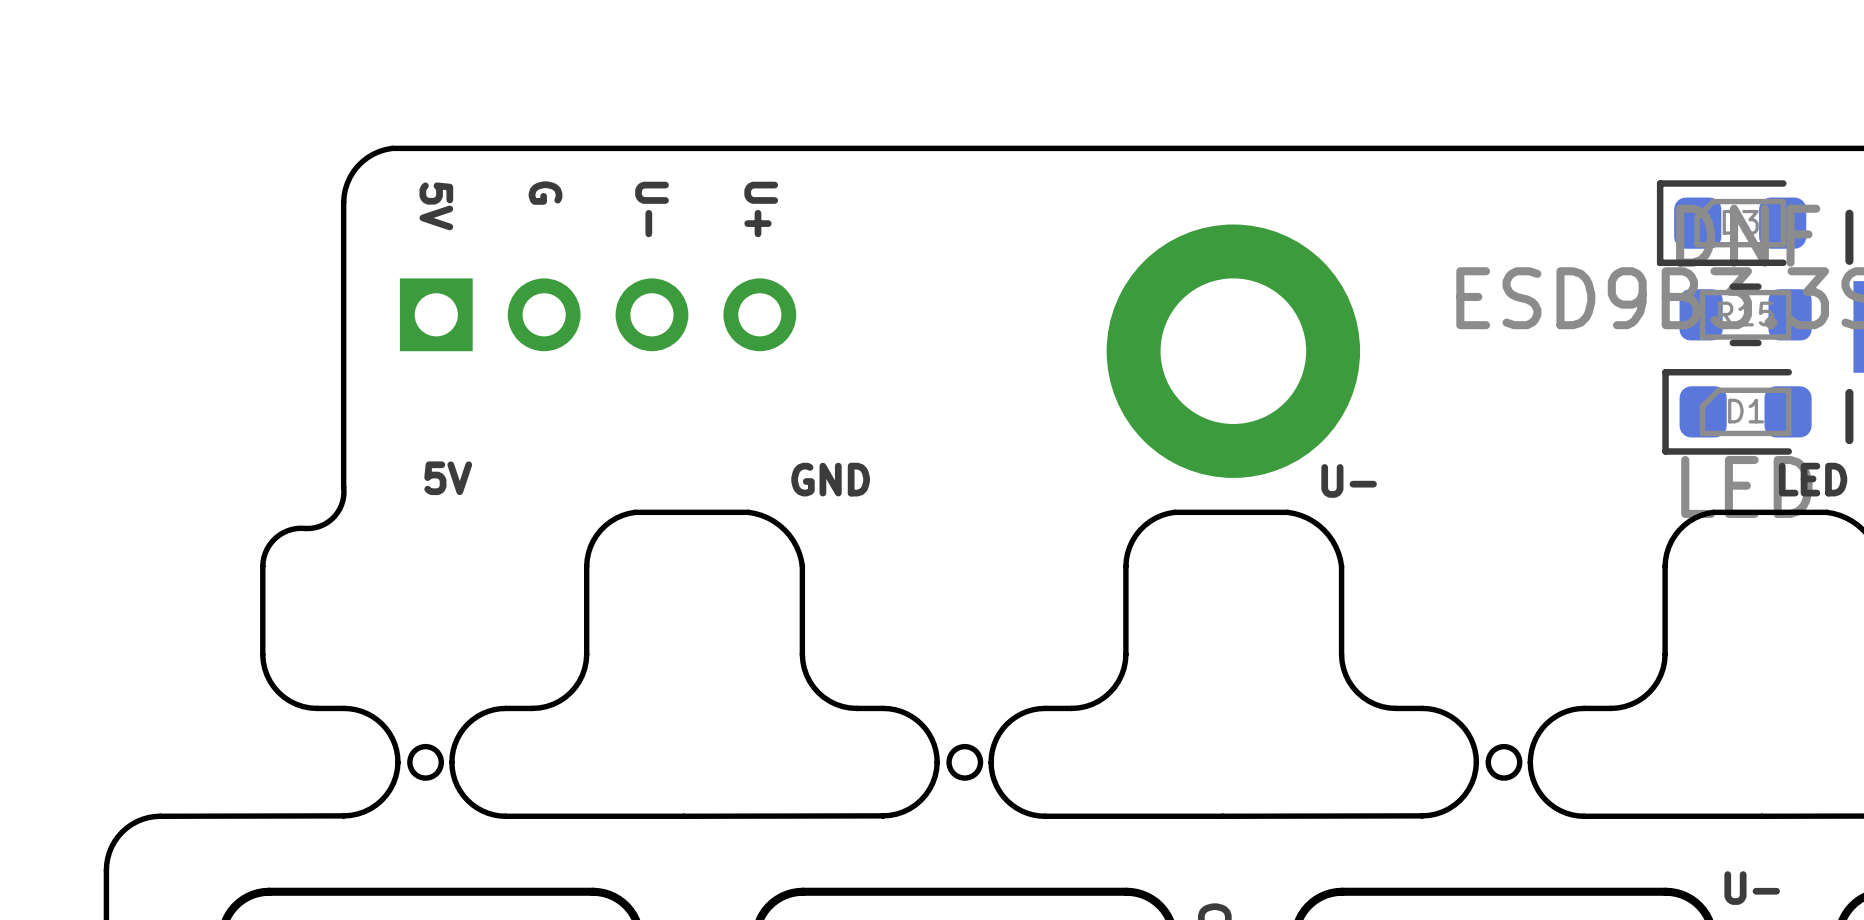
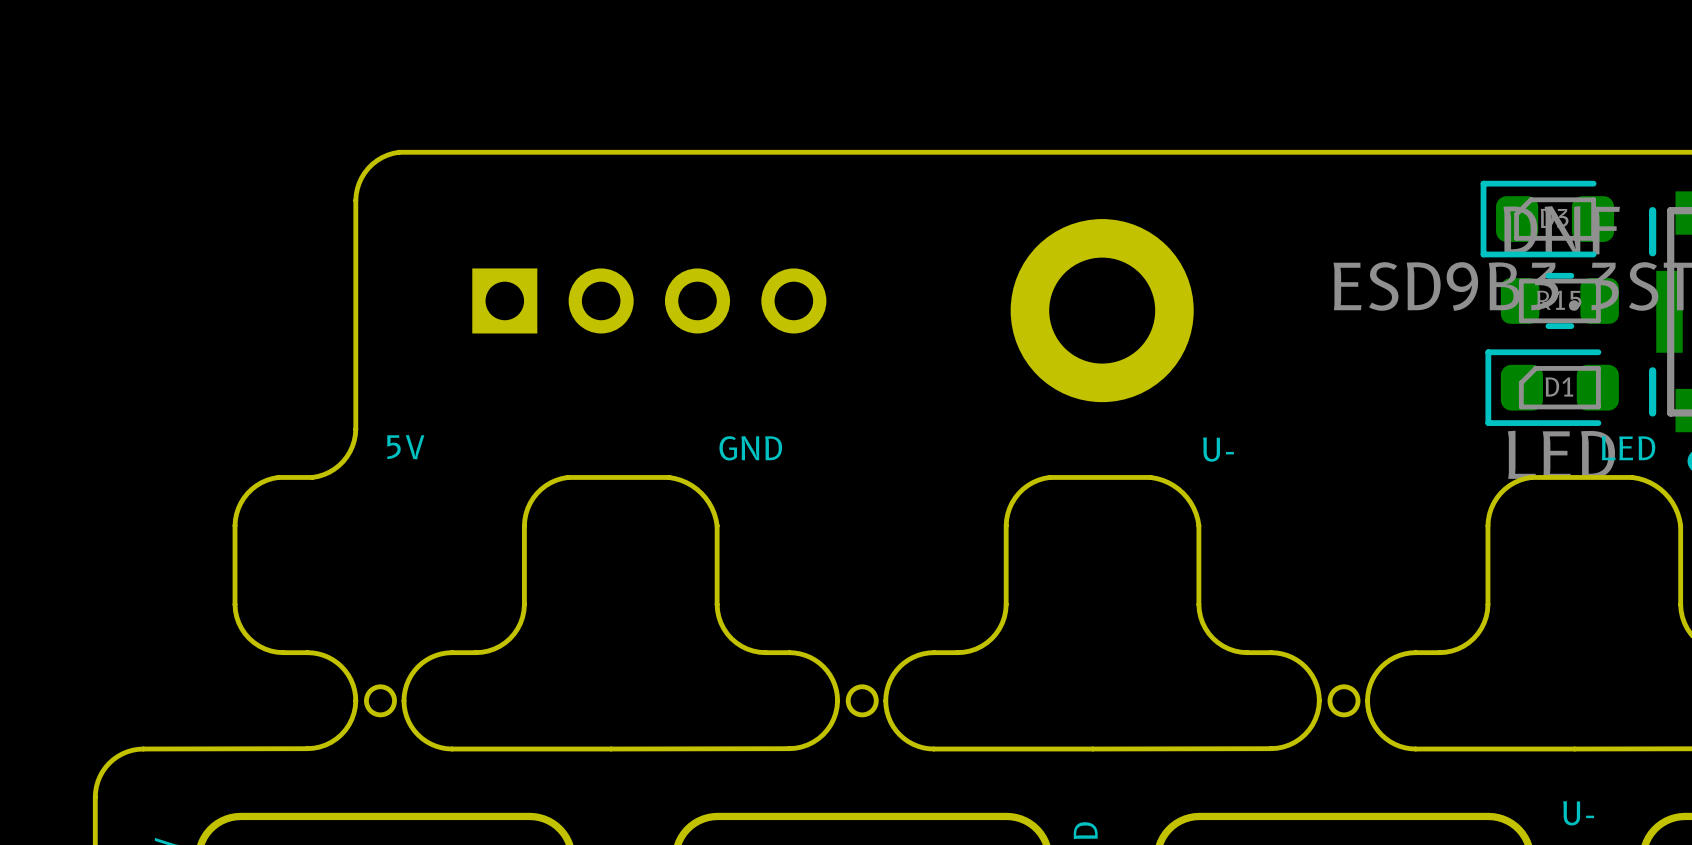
board edge: (446, 148) (392, 148) (379, 151) (362, 161) (353, 171) (347, 182) (343, 202) (342, 500) (337, 513) (323, 524) (310, 528) (292, 529) (275, 537) (267, 548) (262, 566) -> (399, 152) (387, 155) (372, 164) (361, 177) (356, 194) (355, 429) (352, 446) (338, 465) (323, 474) (312, 477) (278, 477) (256, 485) (240, 503) (235, 525)
text: G (545, 193) -> none
text: 5V (436, 206) -> none
text: U- (652, 209) -> none
text: U+ (761, 209) -> none
part footprint: [1106, 224, 1361, 478] -> [1010, 219, 1194, 403]
part position: (598, 314) -> (649, 300)

